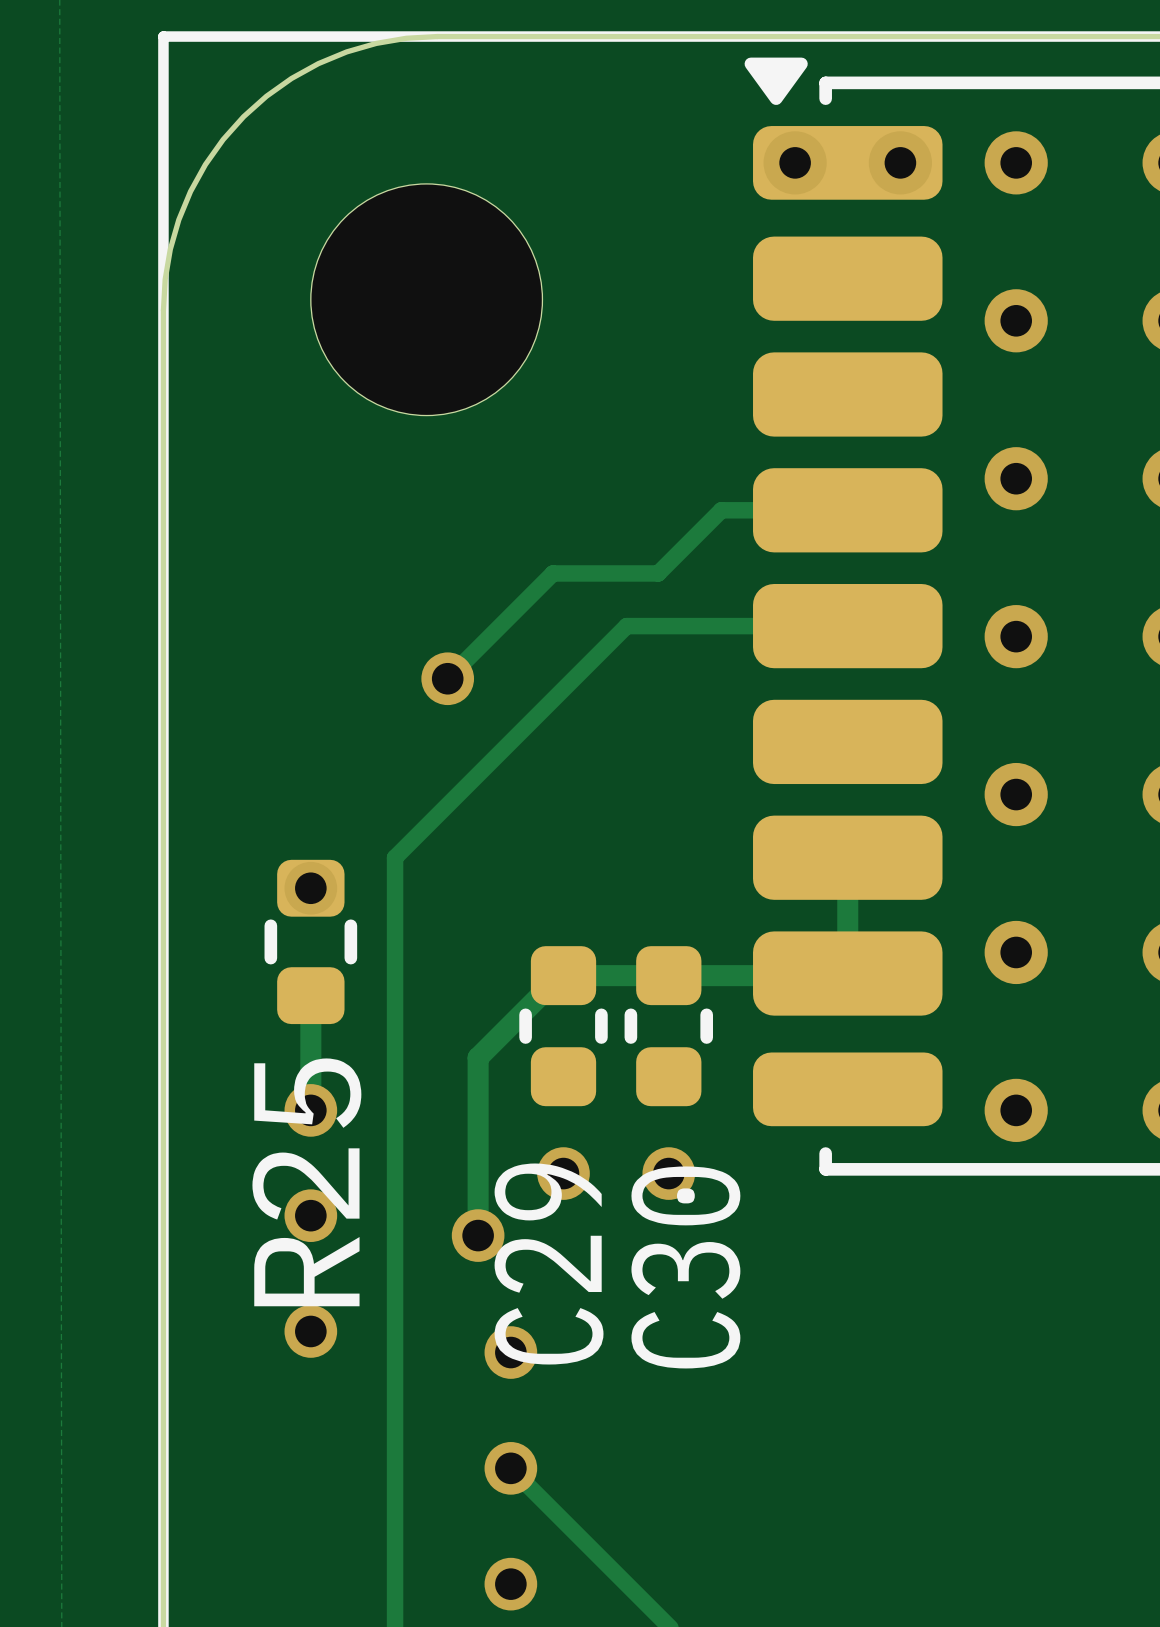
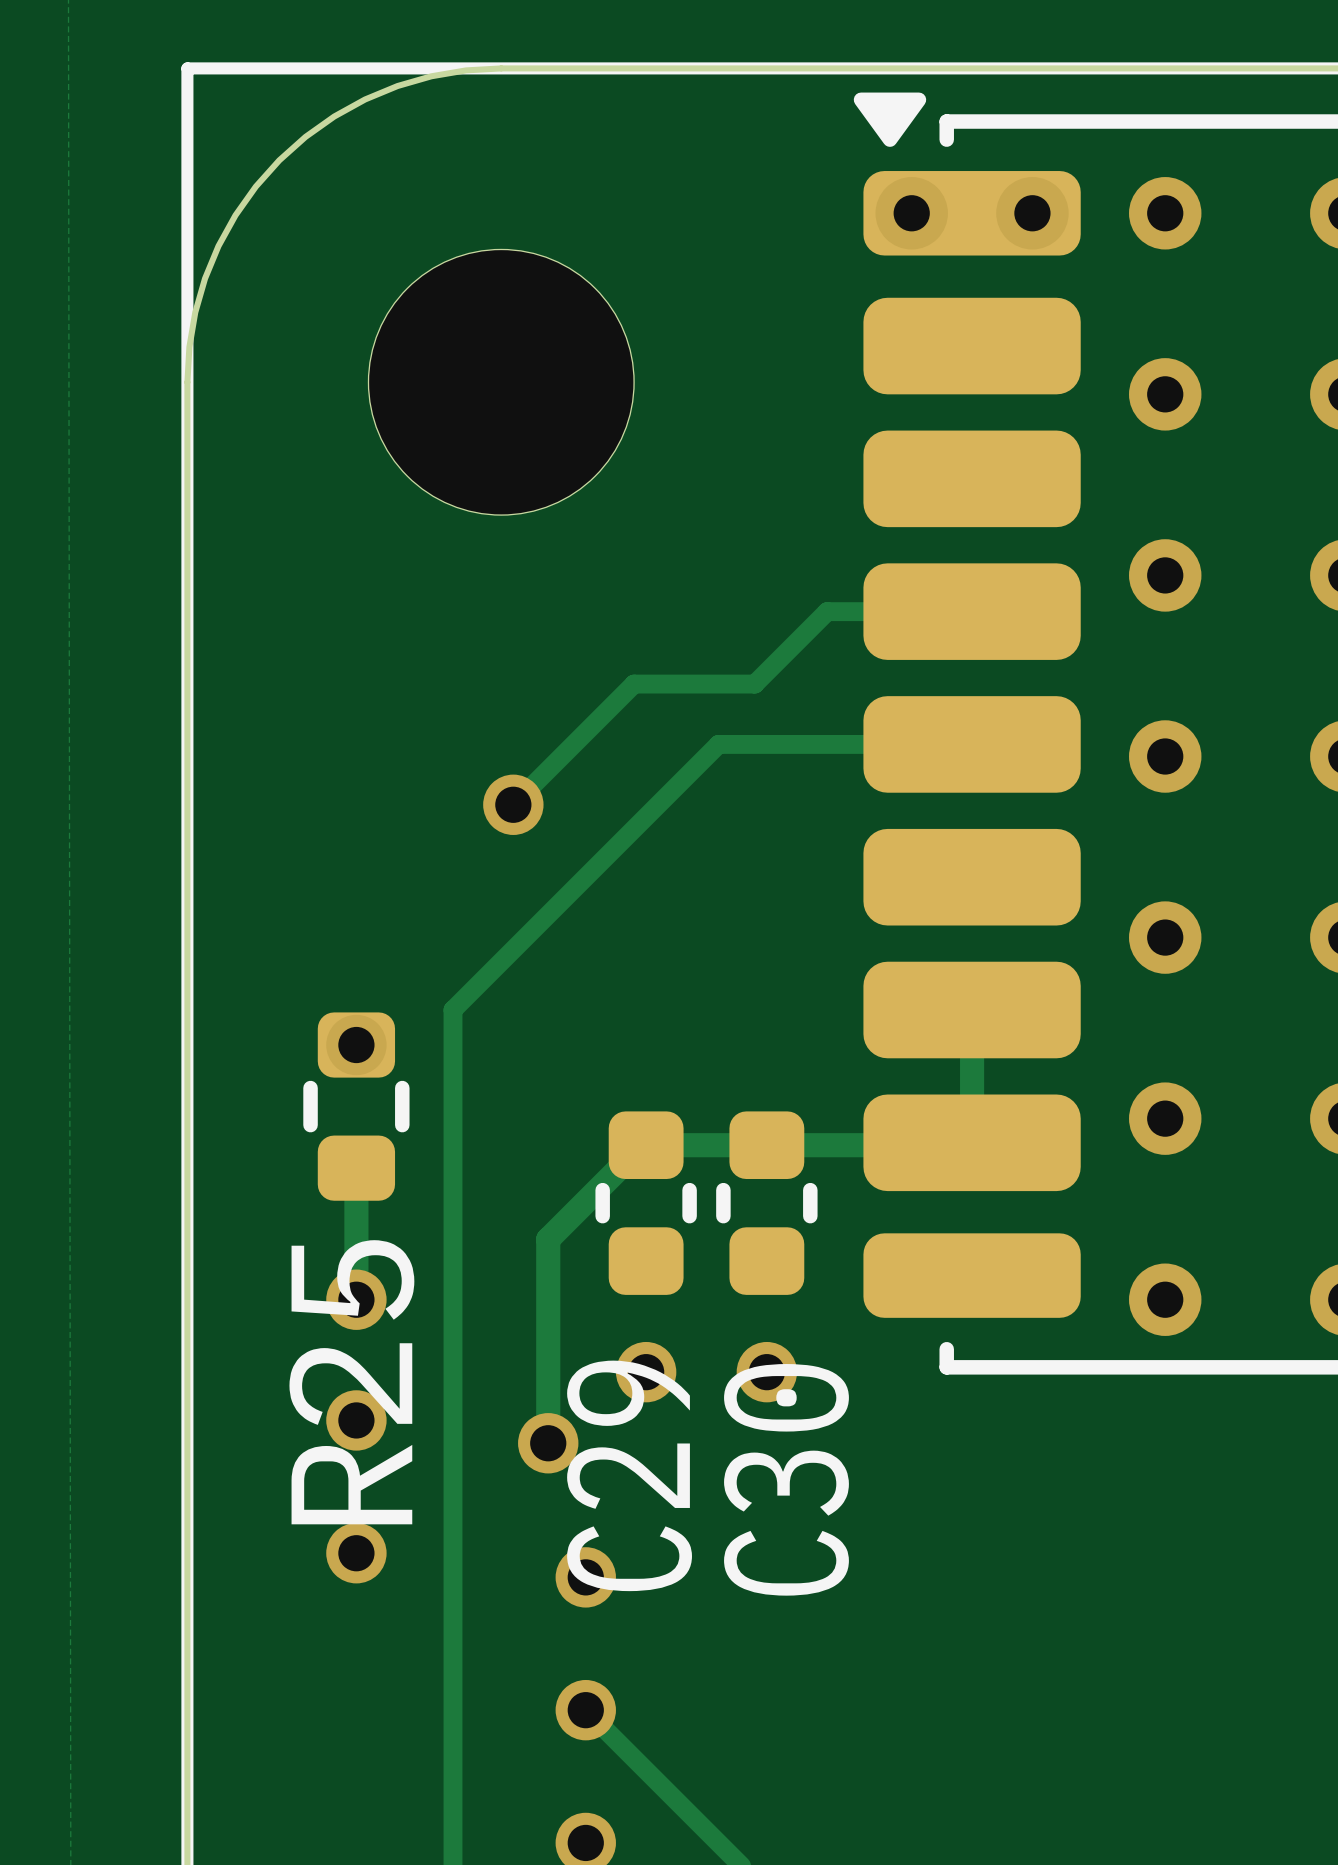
part position: (426, 299) -> (501, 382)

